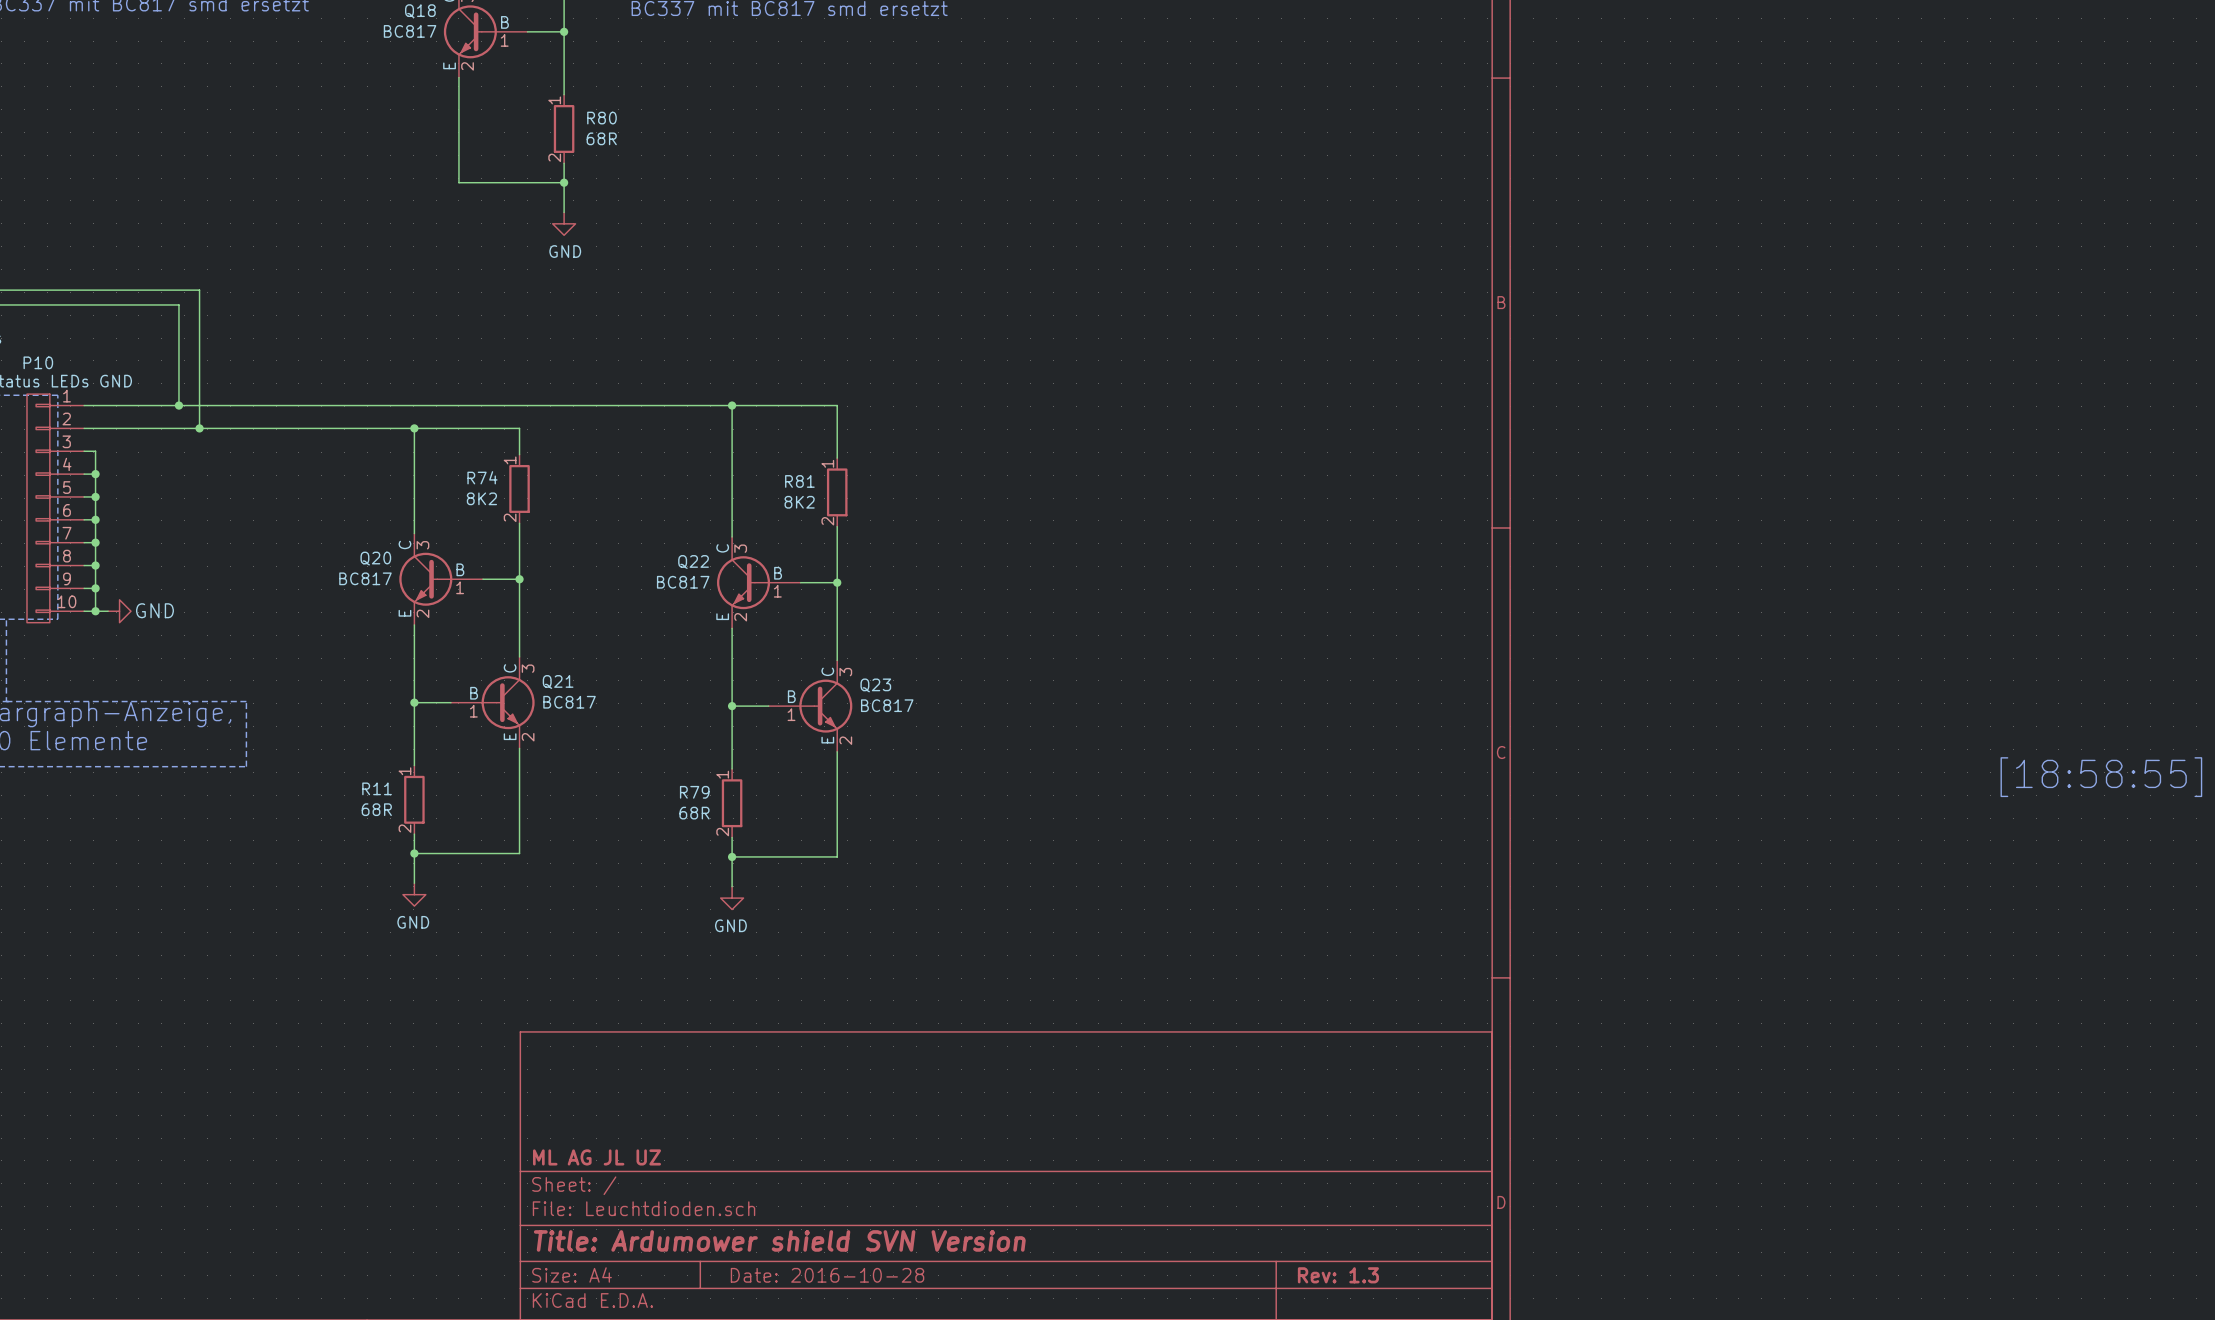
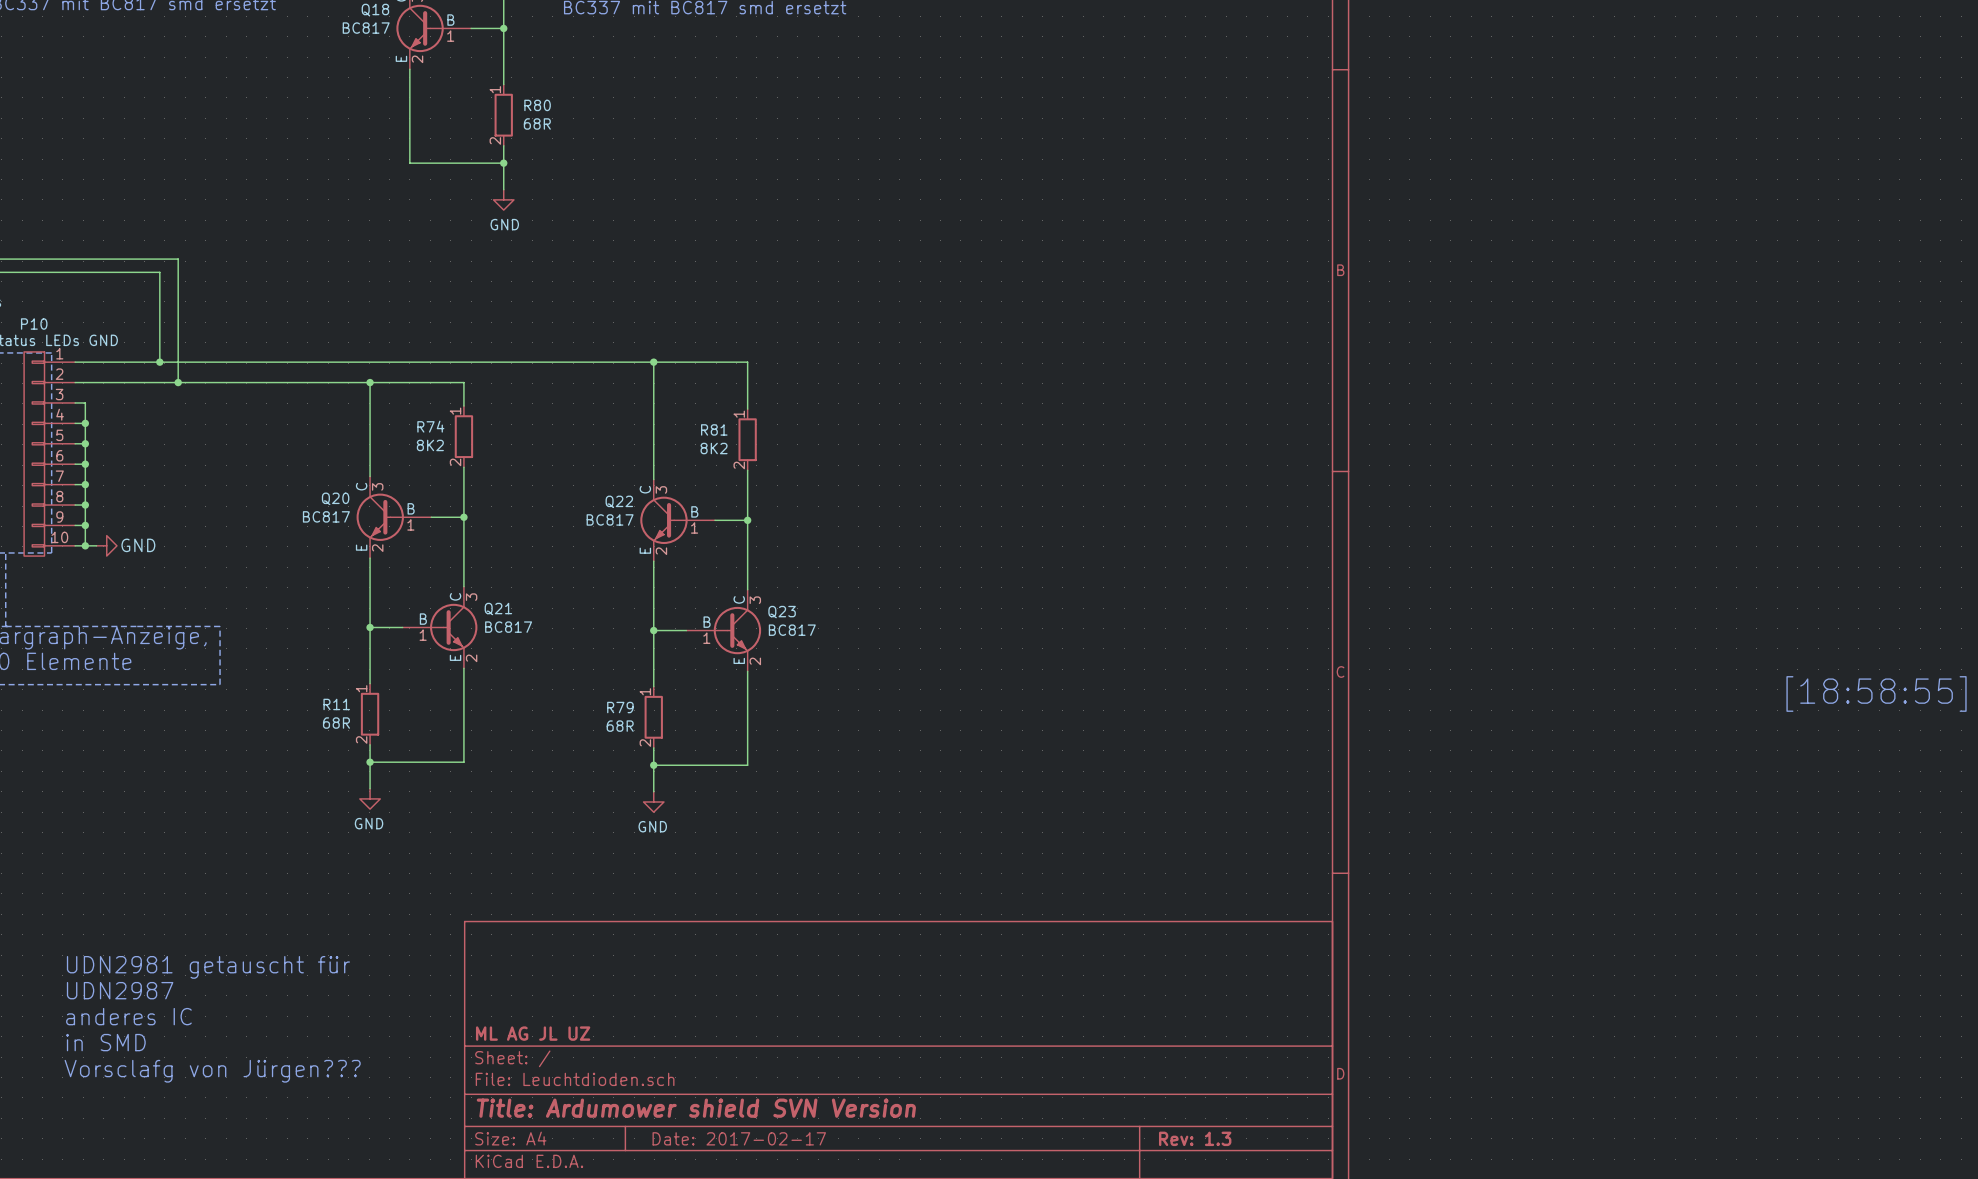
text: none -> UDN2981 getauscht für (208, 967)
text: none -> UDN2987 (120, 990)
text: none -> anderes IC (128, 1016)
text: none -> in SMD (105, 1042)
text: none -> Vorsclafg von Jürgen??? (212, 1071)
title block: Date: 2016-10-28 (827, 1275) -> Date: 2017-02-17 (739, 1138)

